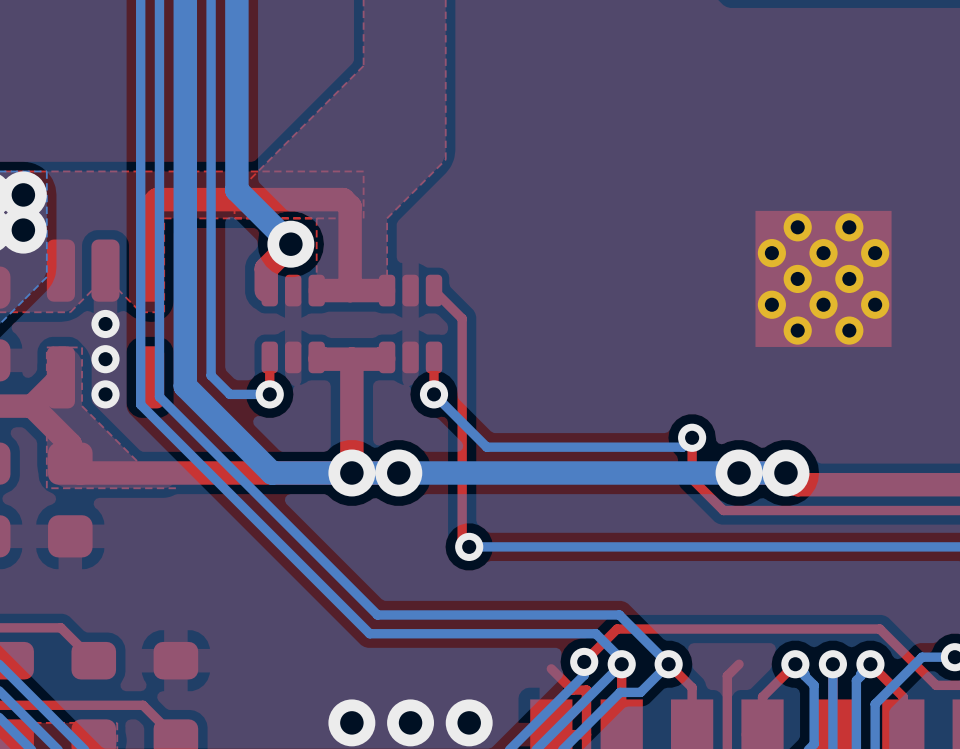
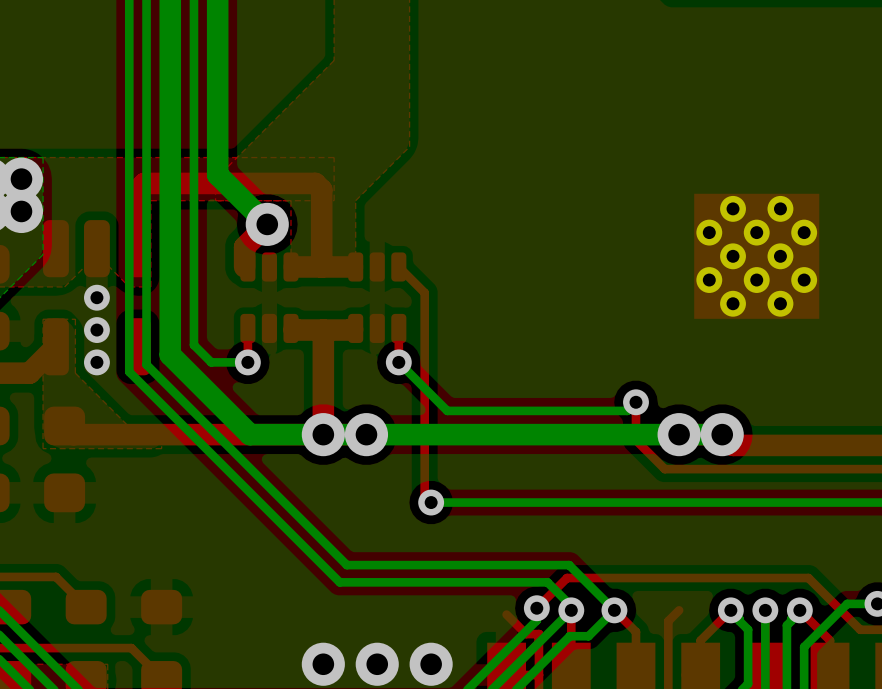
top track: (32, 406) (70, 444) (70, 463) -> none

